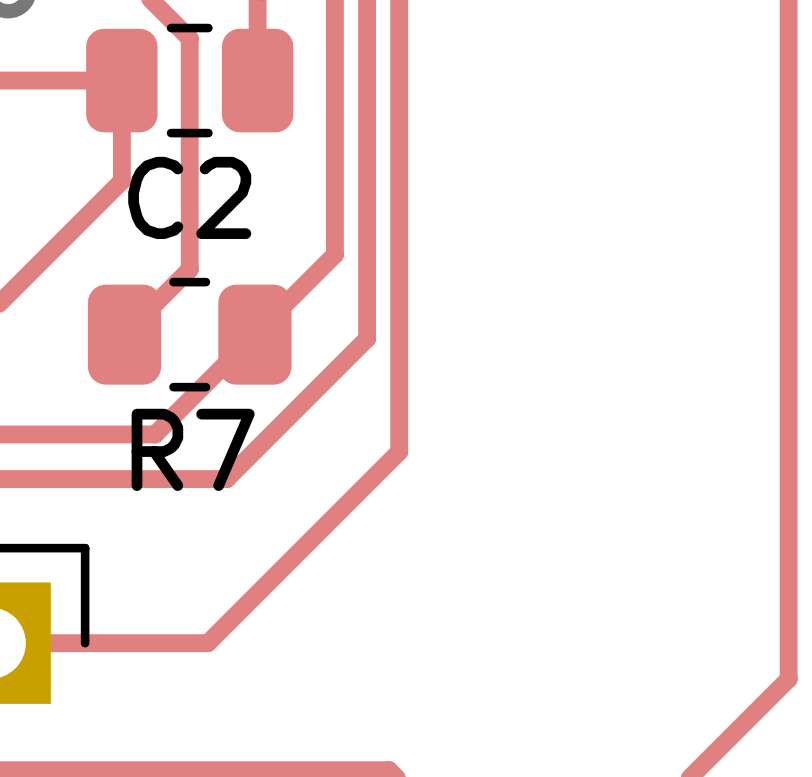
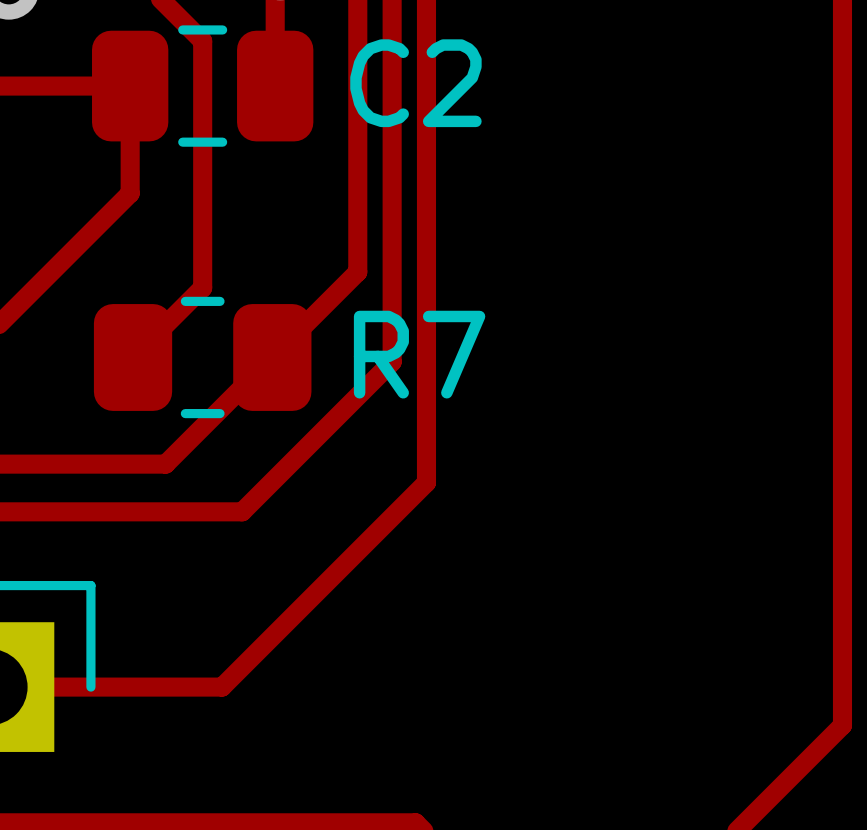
C2 name position: C2 (189, 197) -> C2 (415, 83)
R7 name position: R7 (193, 449) -> R7 (419, 354)

